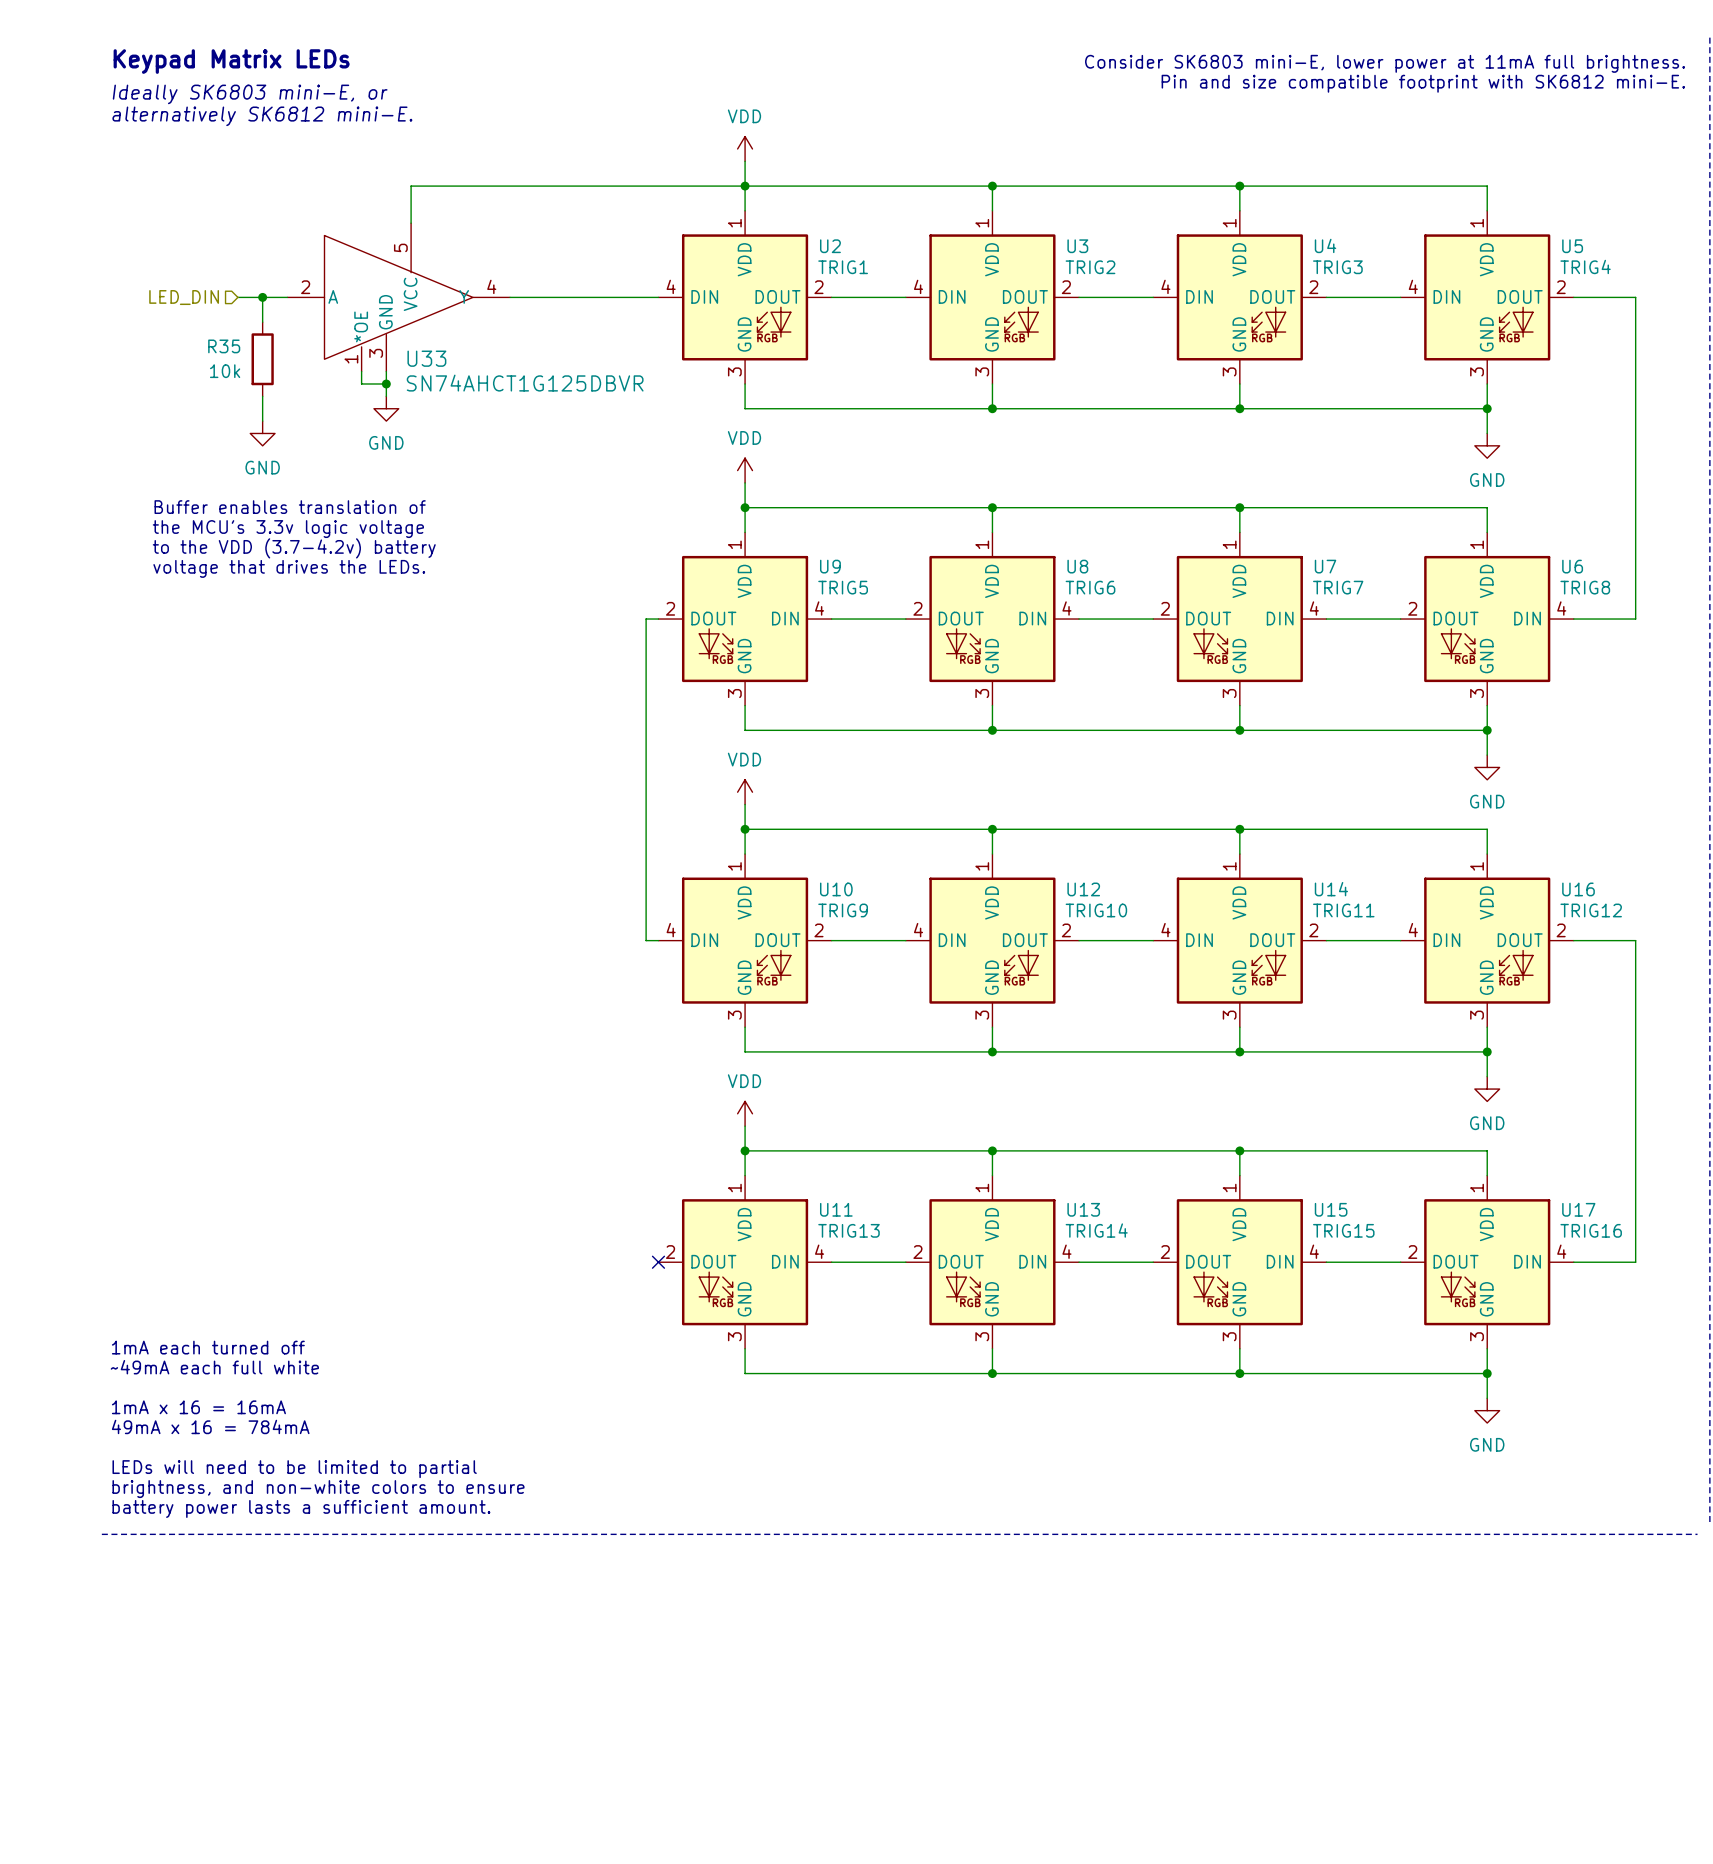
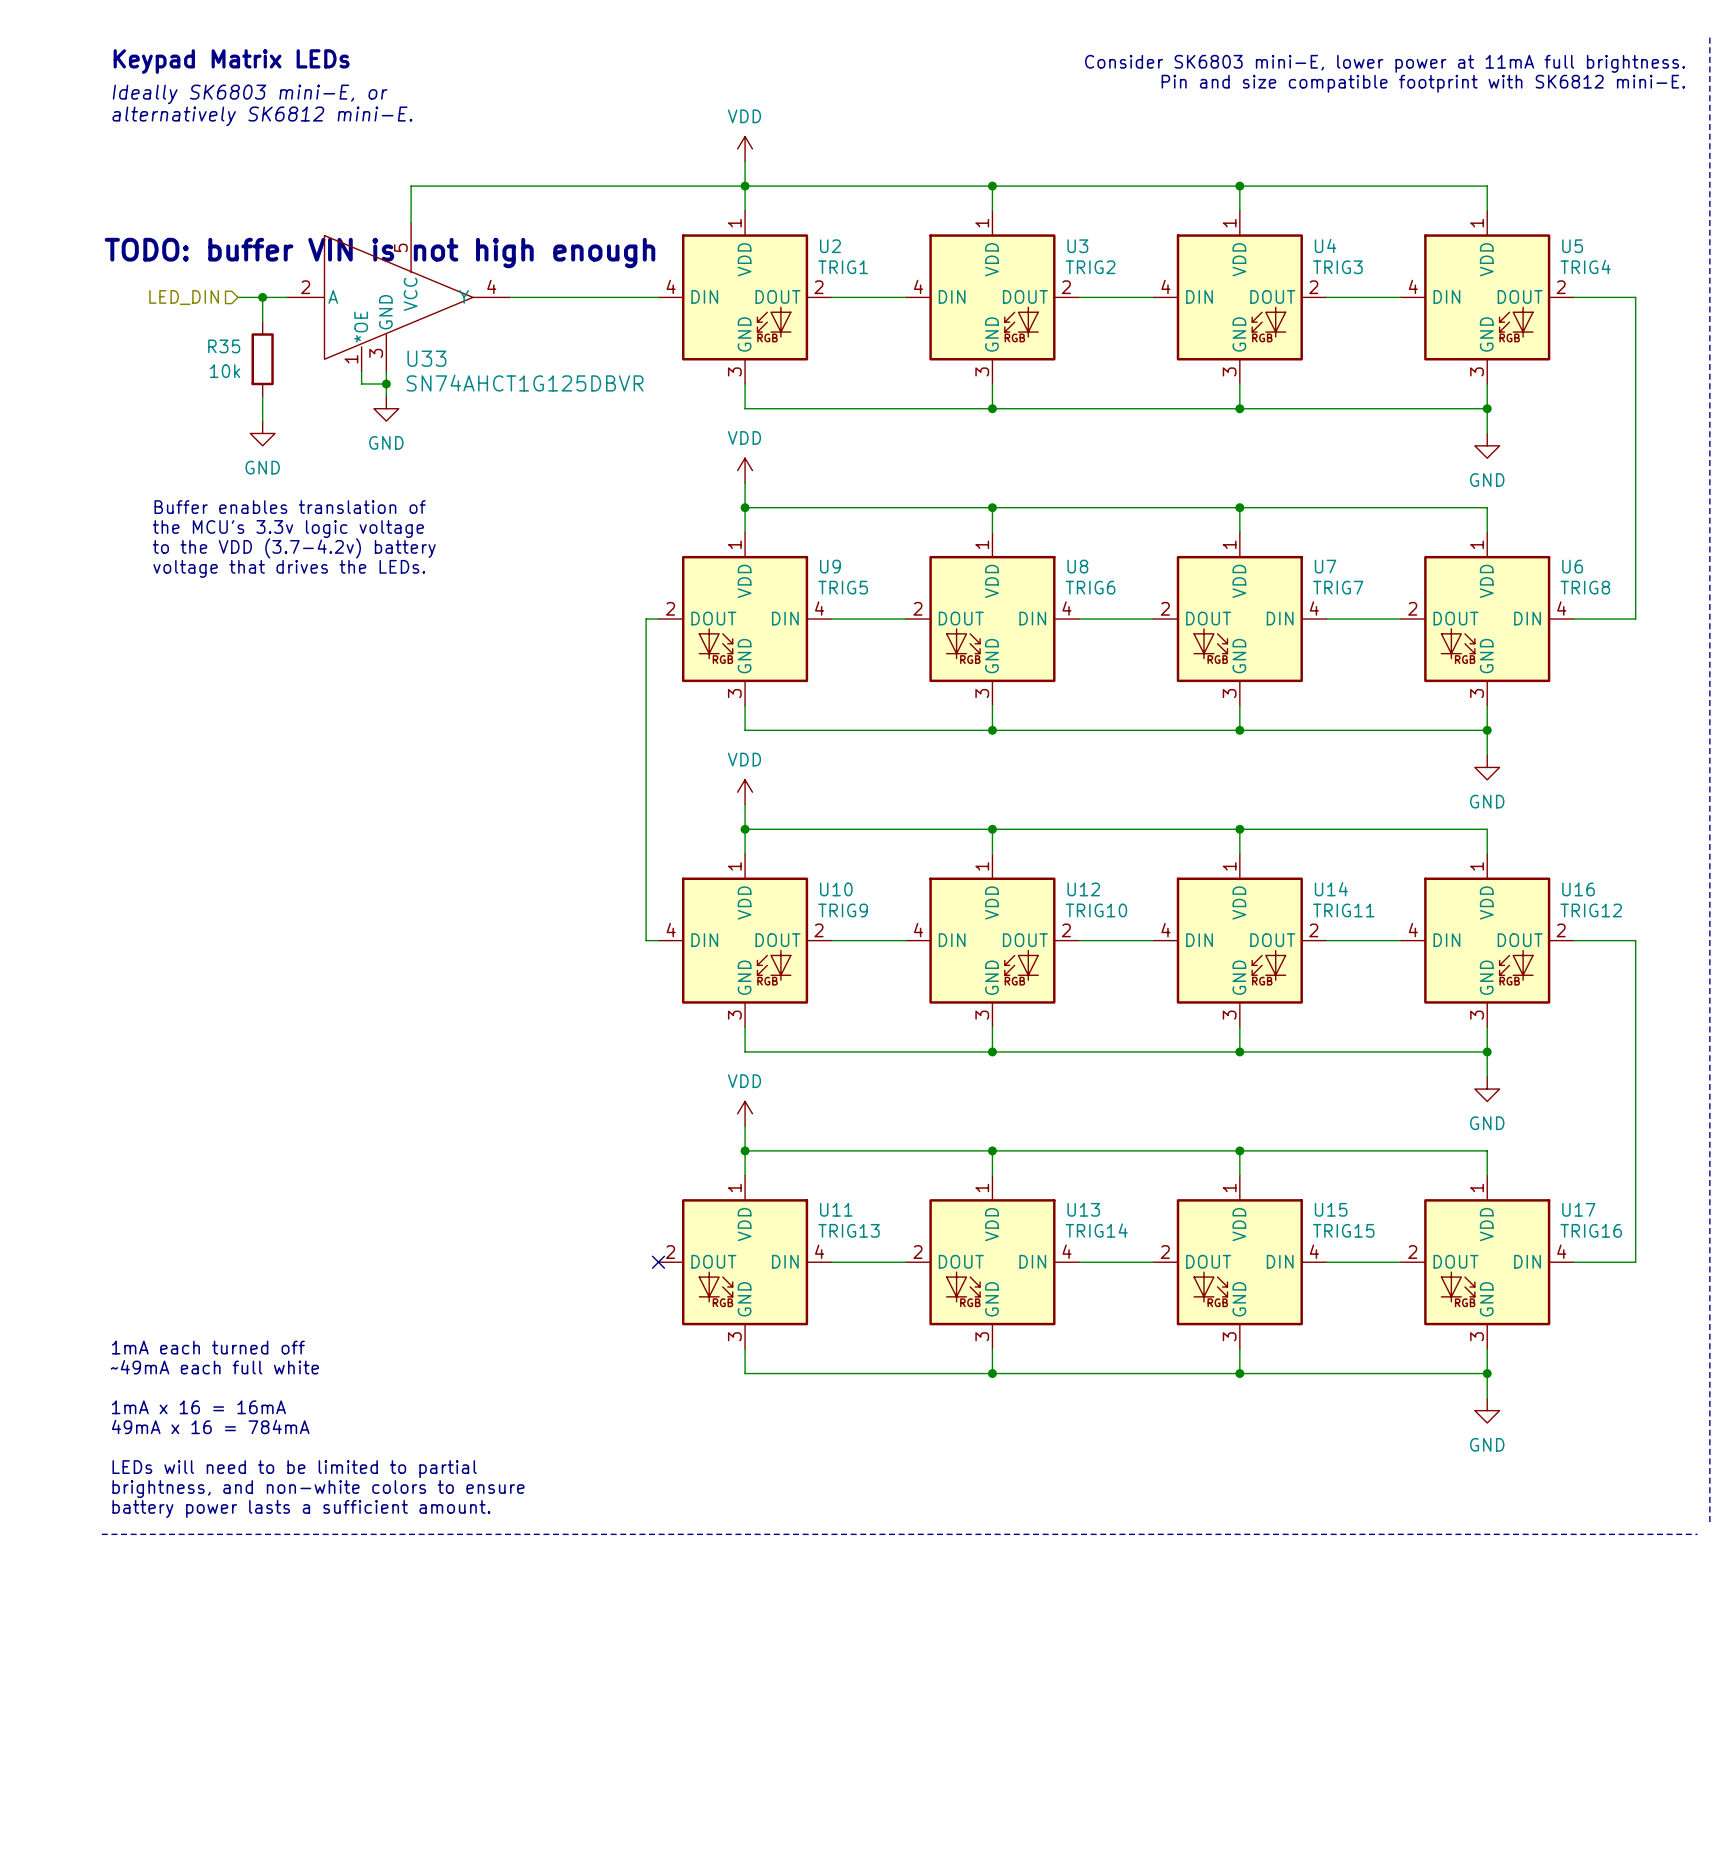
text: none -> TODO: buffer VIN is not high enough (379, 253)

